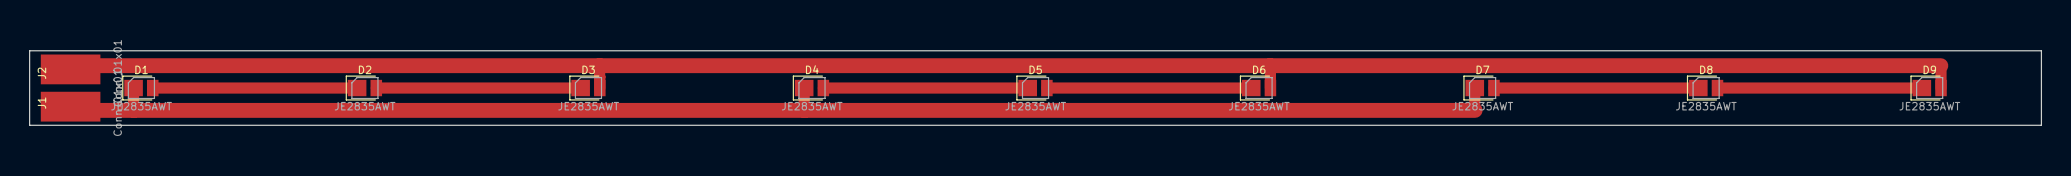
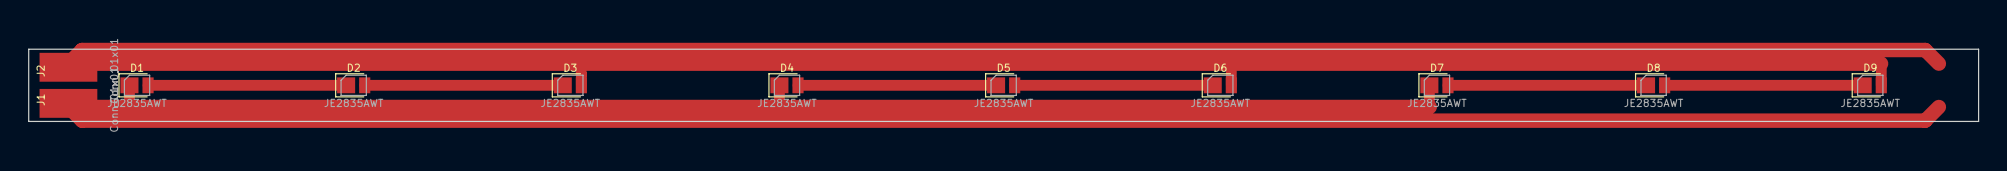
track: none -> (68, 63) (82, 50) (1925, 50) (1938, 63)
track: none -> (68, 106) (82, 120) (1925, 120) (1938, 106)

